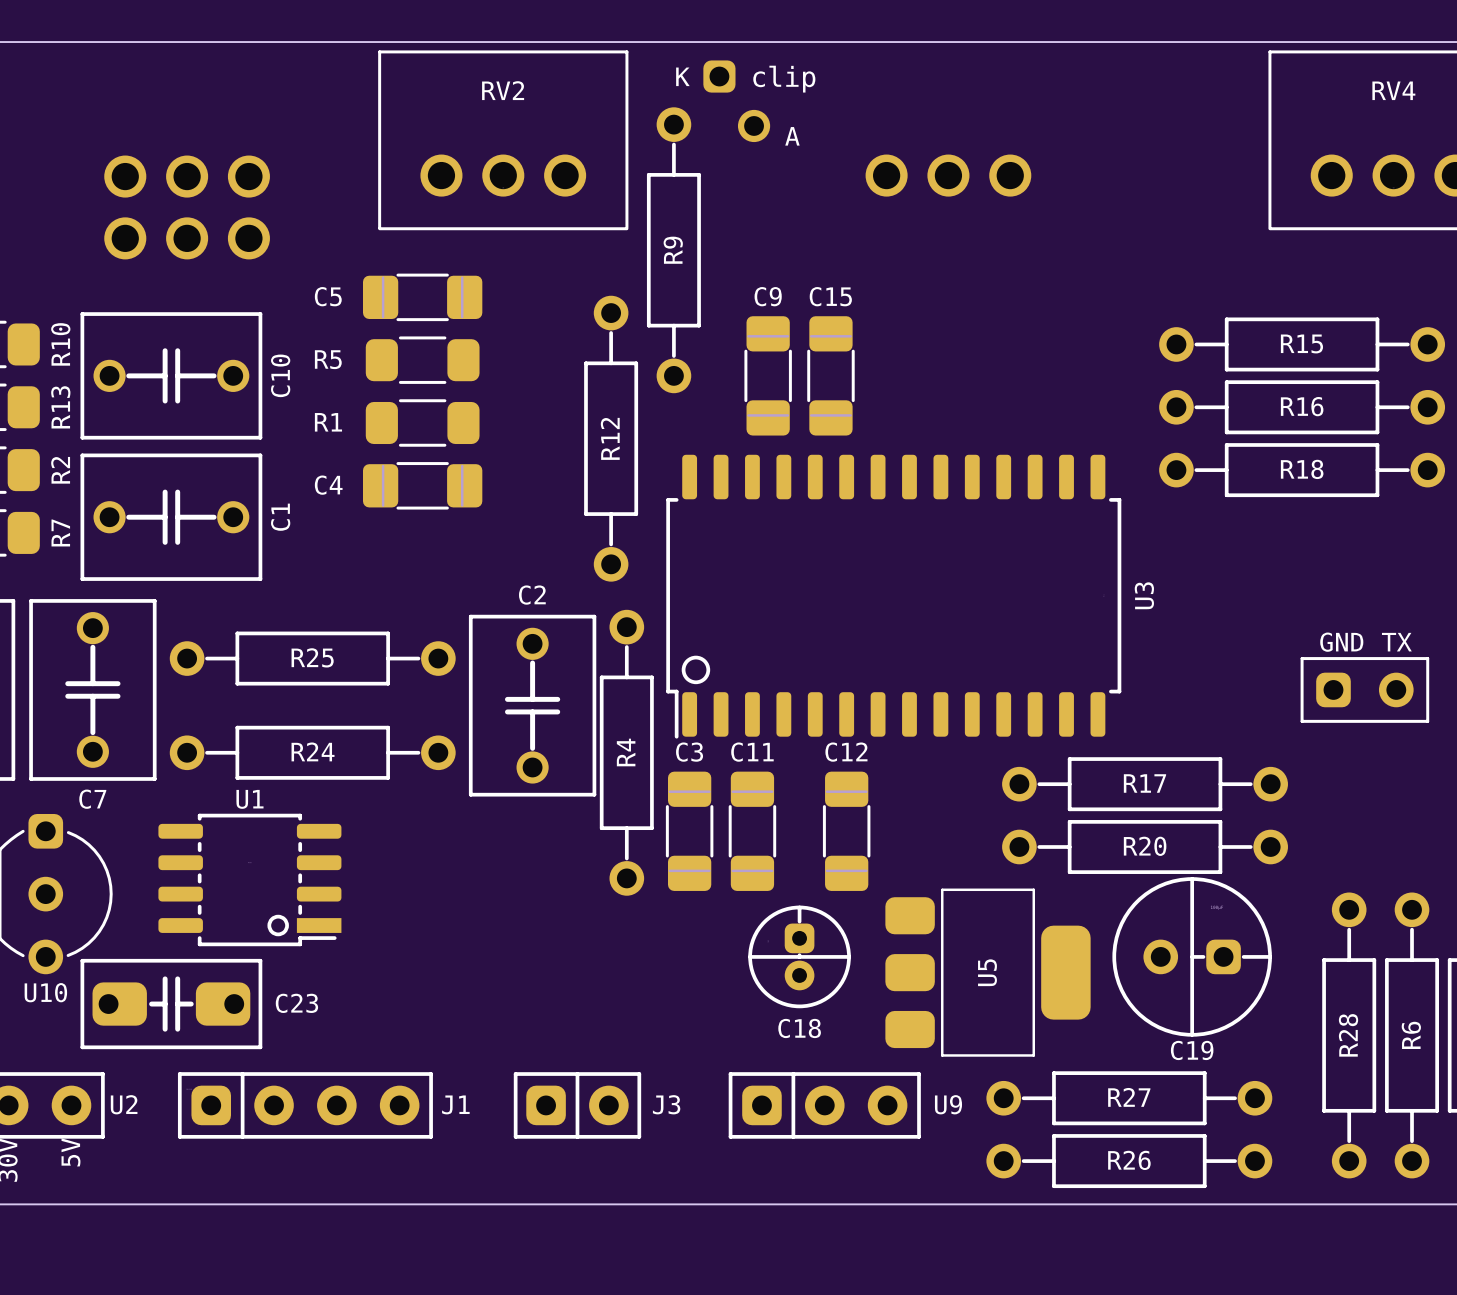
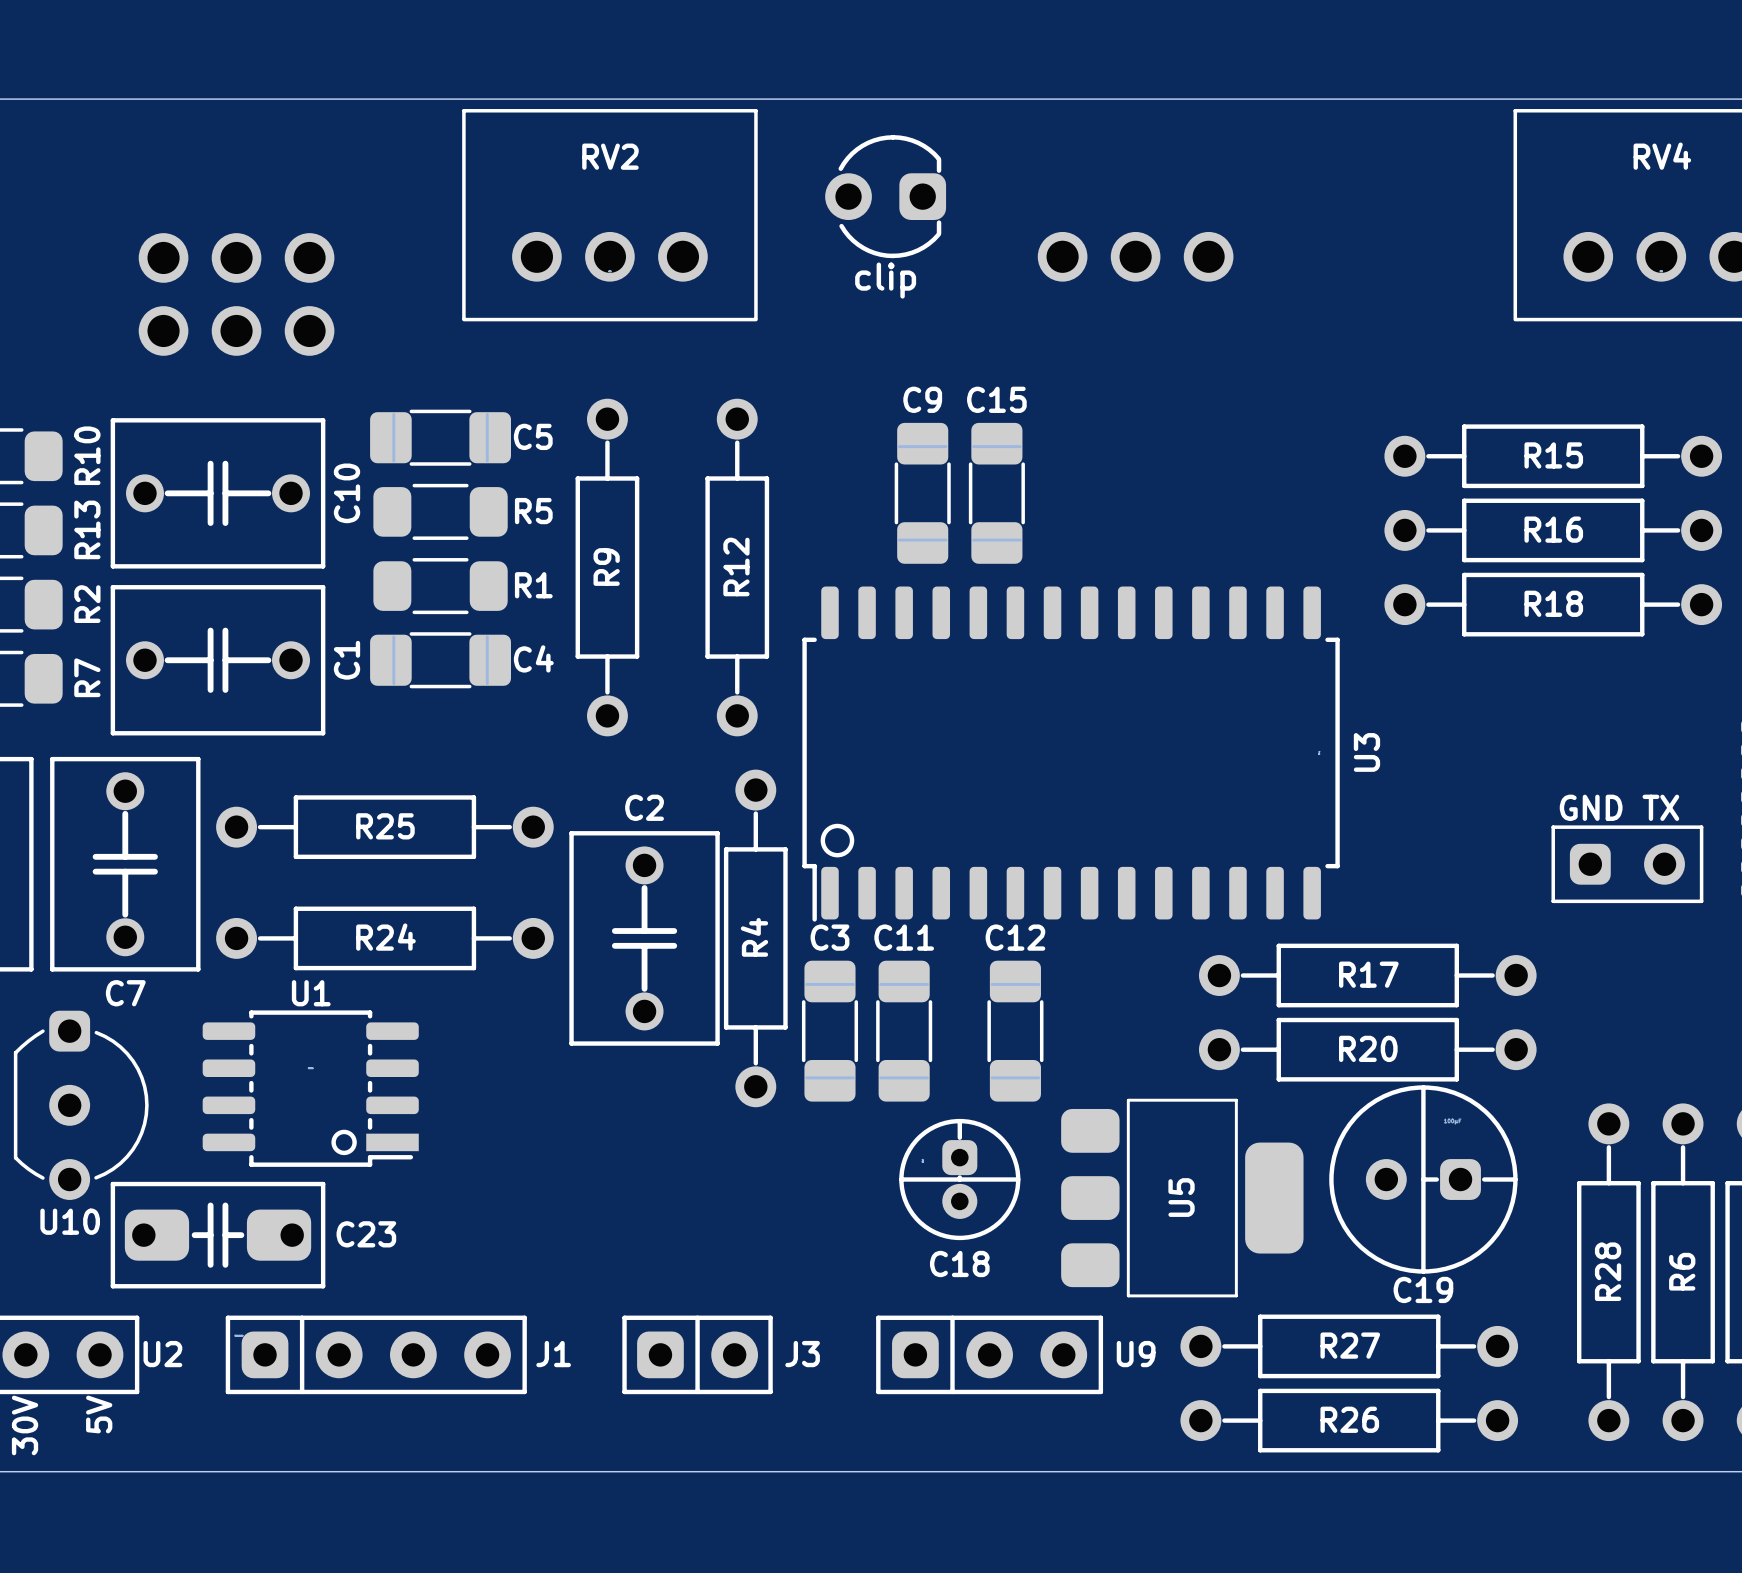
part footprint: [703, 60, 771, 143] -> [825, 135, 947, 259]
part value position: clip (784, 79) -> clip (885, 280)
R9 position: (673, 250) -> (607, 567)
C5 name position: C5 (328, 296) -> C5 (533, 436)
C5 position: (422, 297) -> (440, 437)
R5 name position: R5 (328, 359) -> R5 (533, 511)
R5 position: (422, 360) -> (440, 511)
R1 name position: R1 (328, 422) -> R1 (533, 585)
R1 position: (422, 422) -> (440, 586)
C4 name position: C4 (328, 485) -> C4 (533, 658)
C4 position: (422, 485) -> (440, 660)
C2 position: (532, 705) -> (644, 938)

